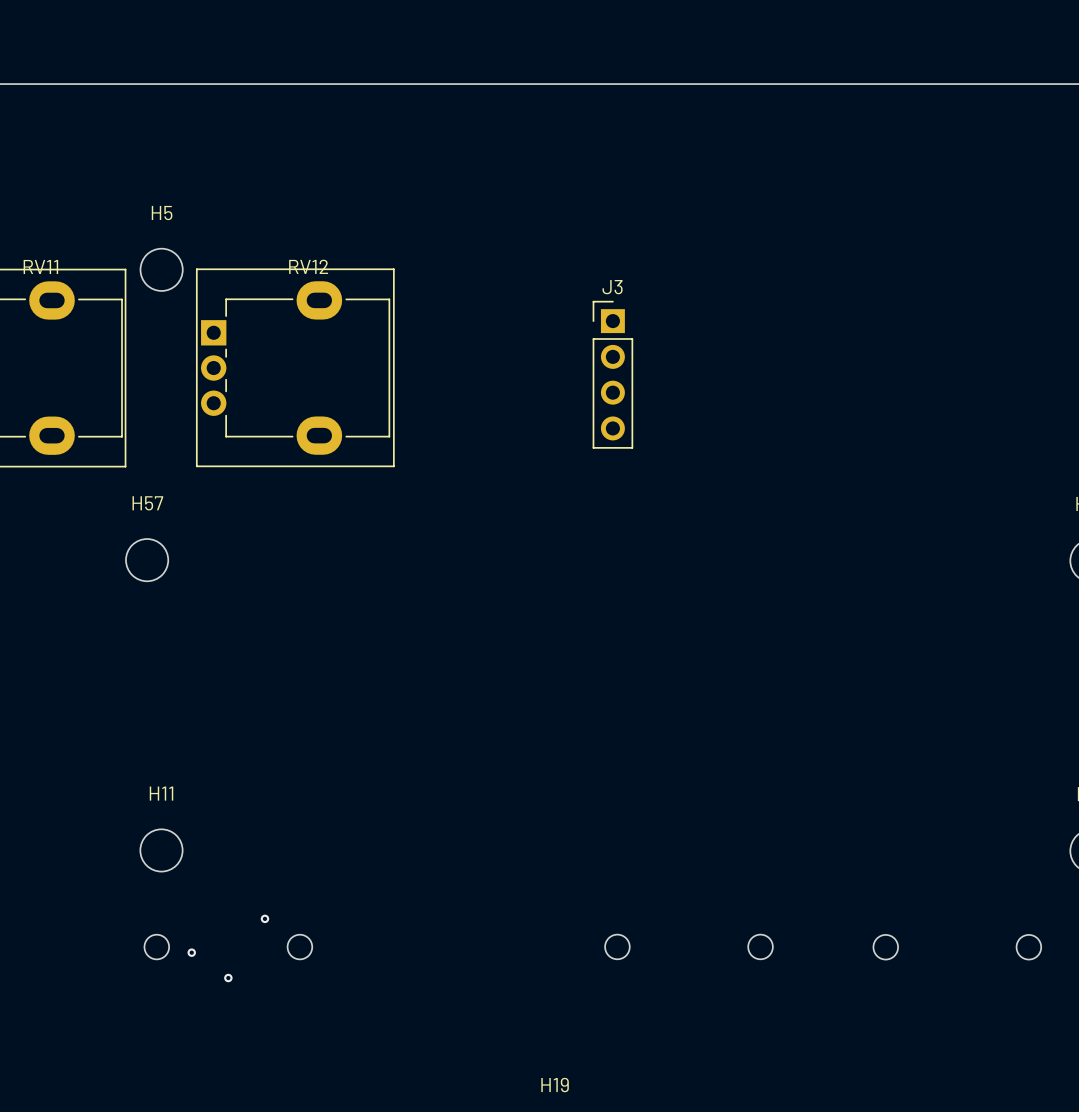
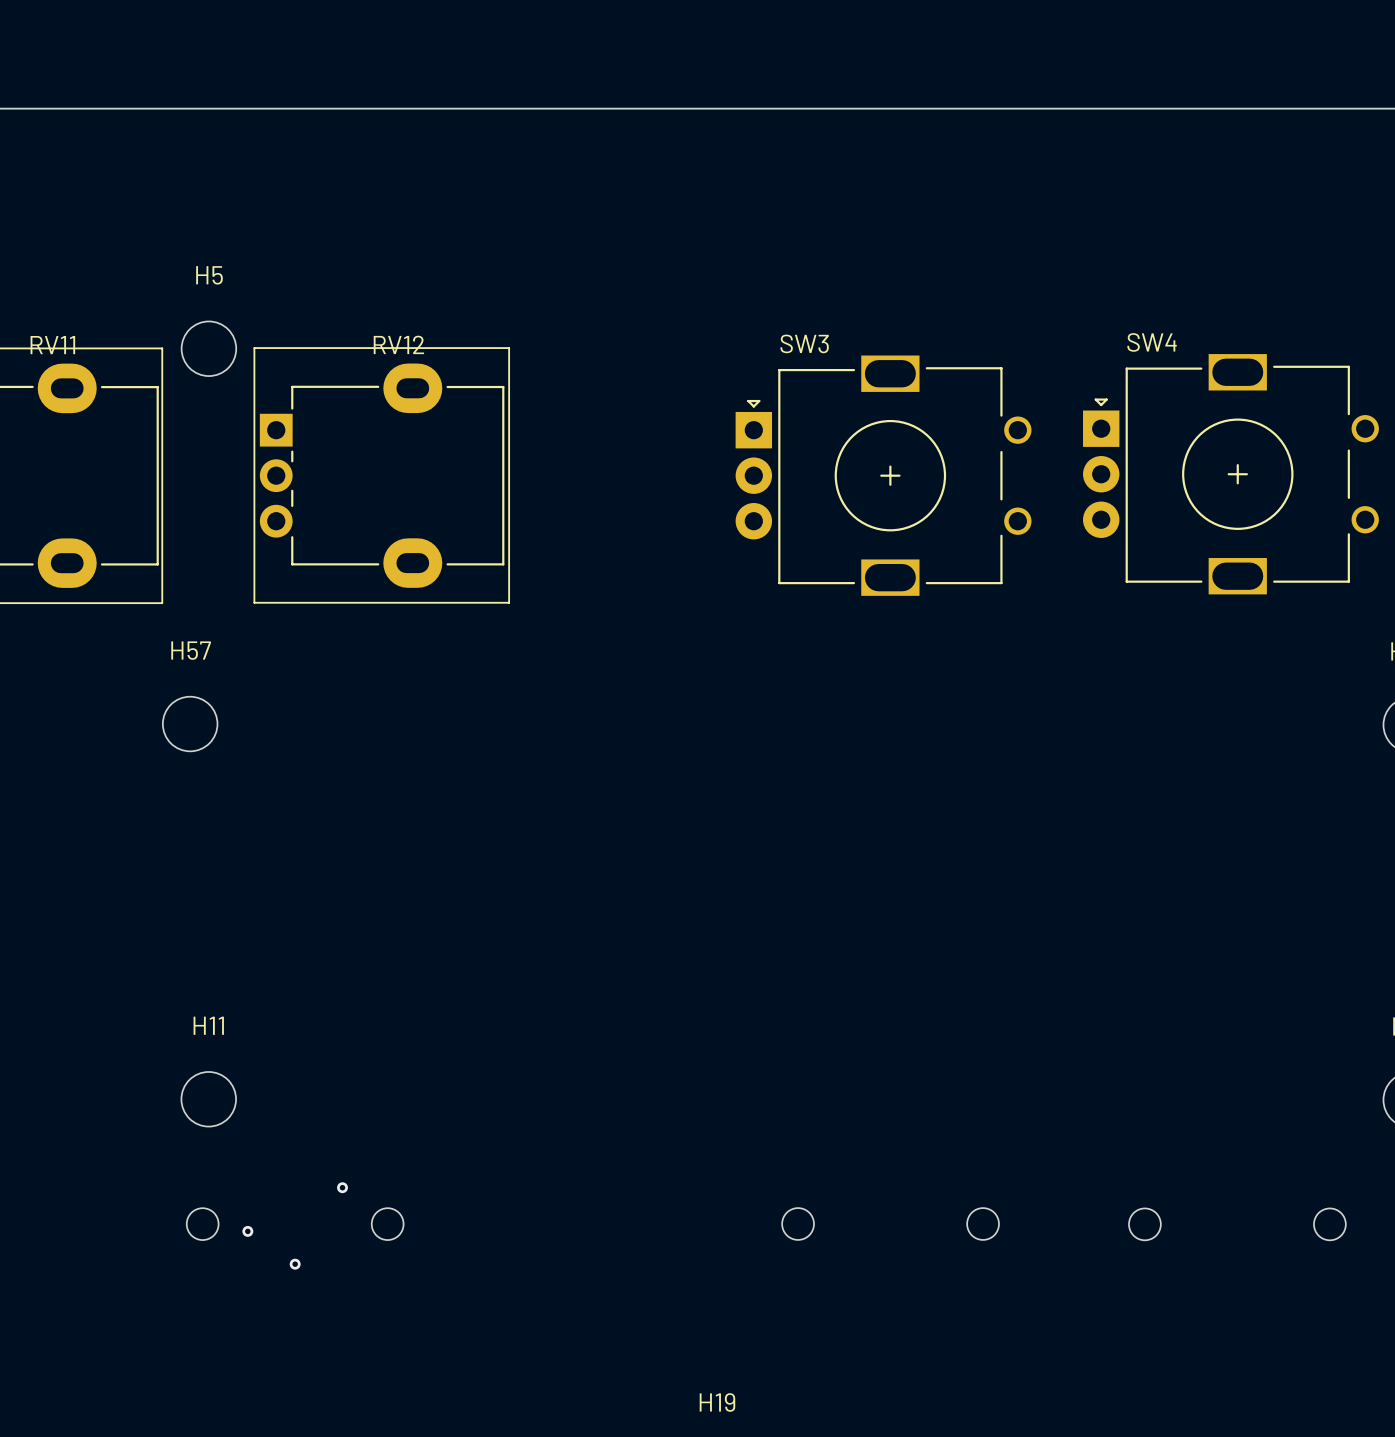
SW4: none -> (1230, 474)
SW3: none -> (883, 475)
J3: (612, 374) -> none

